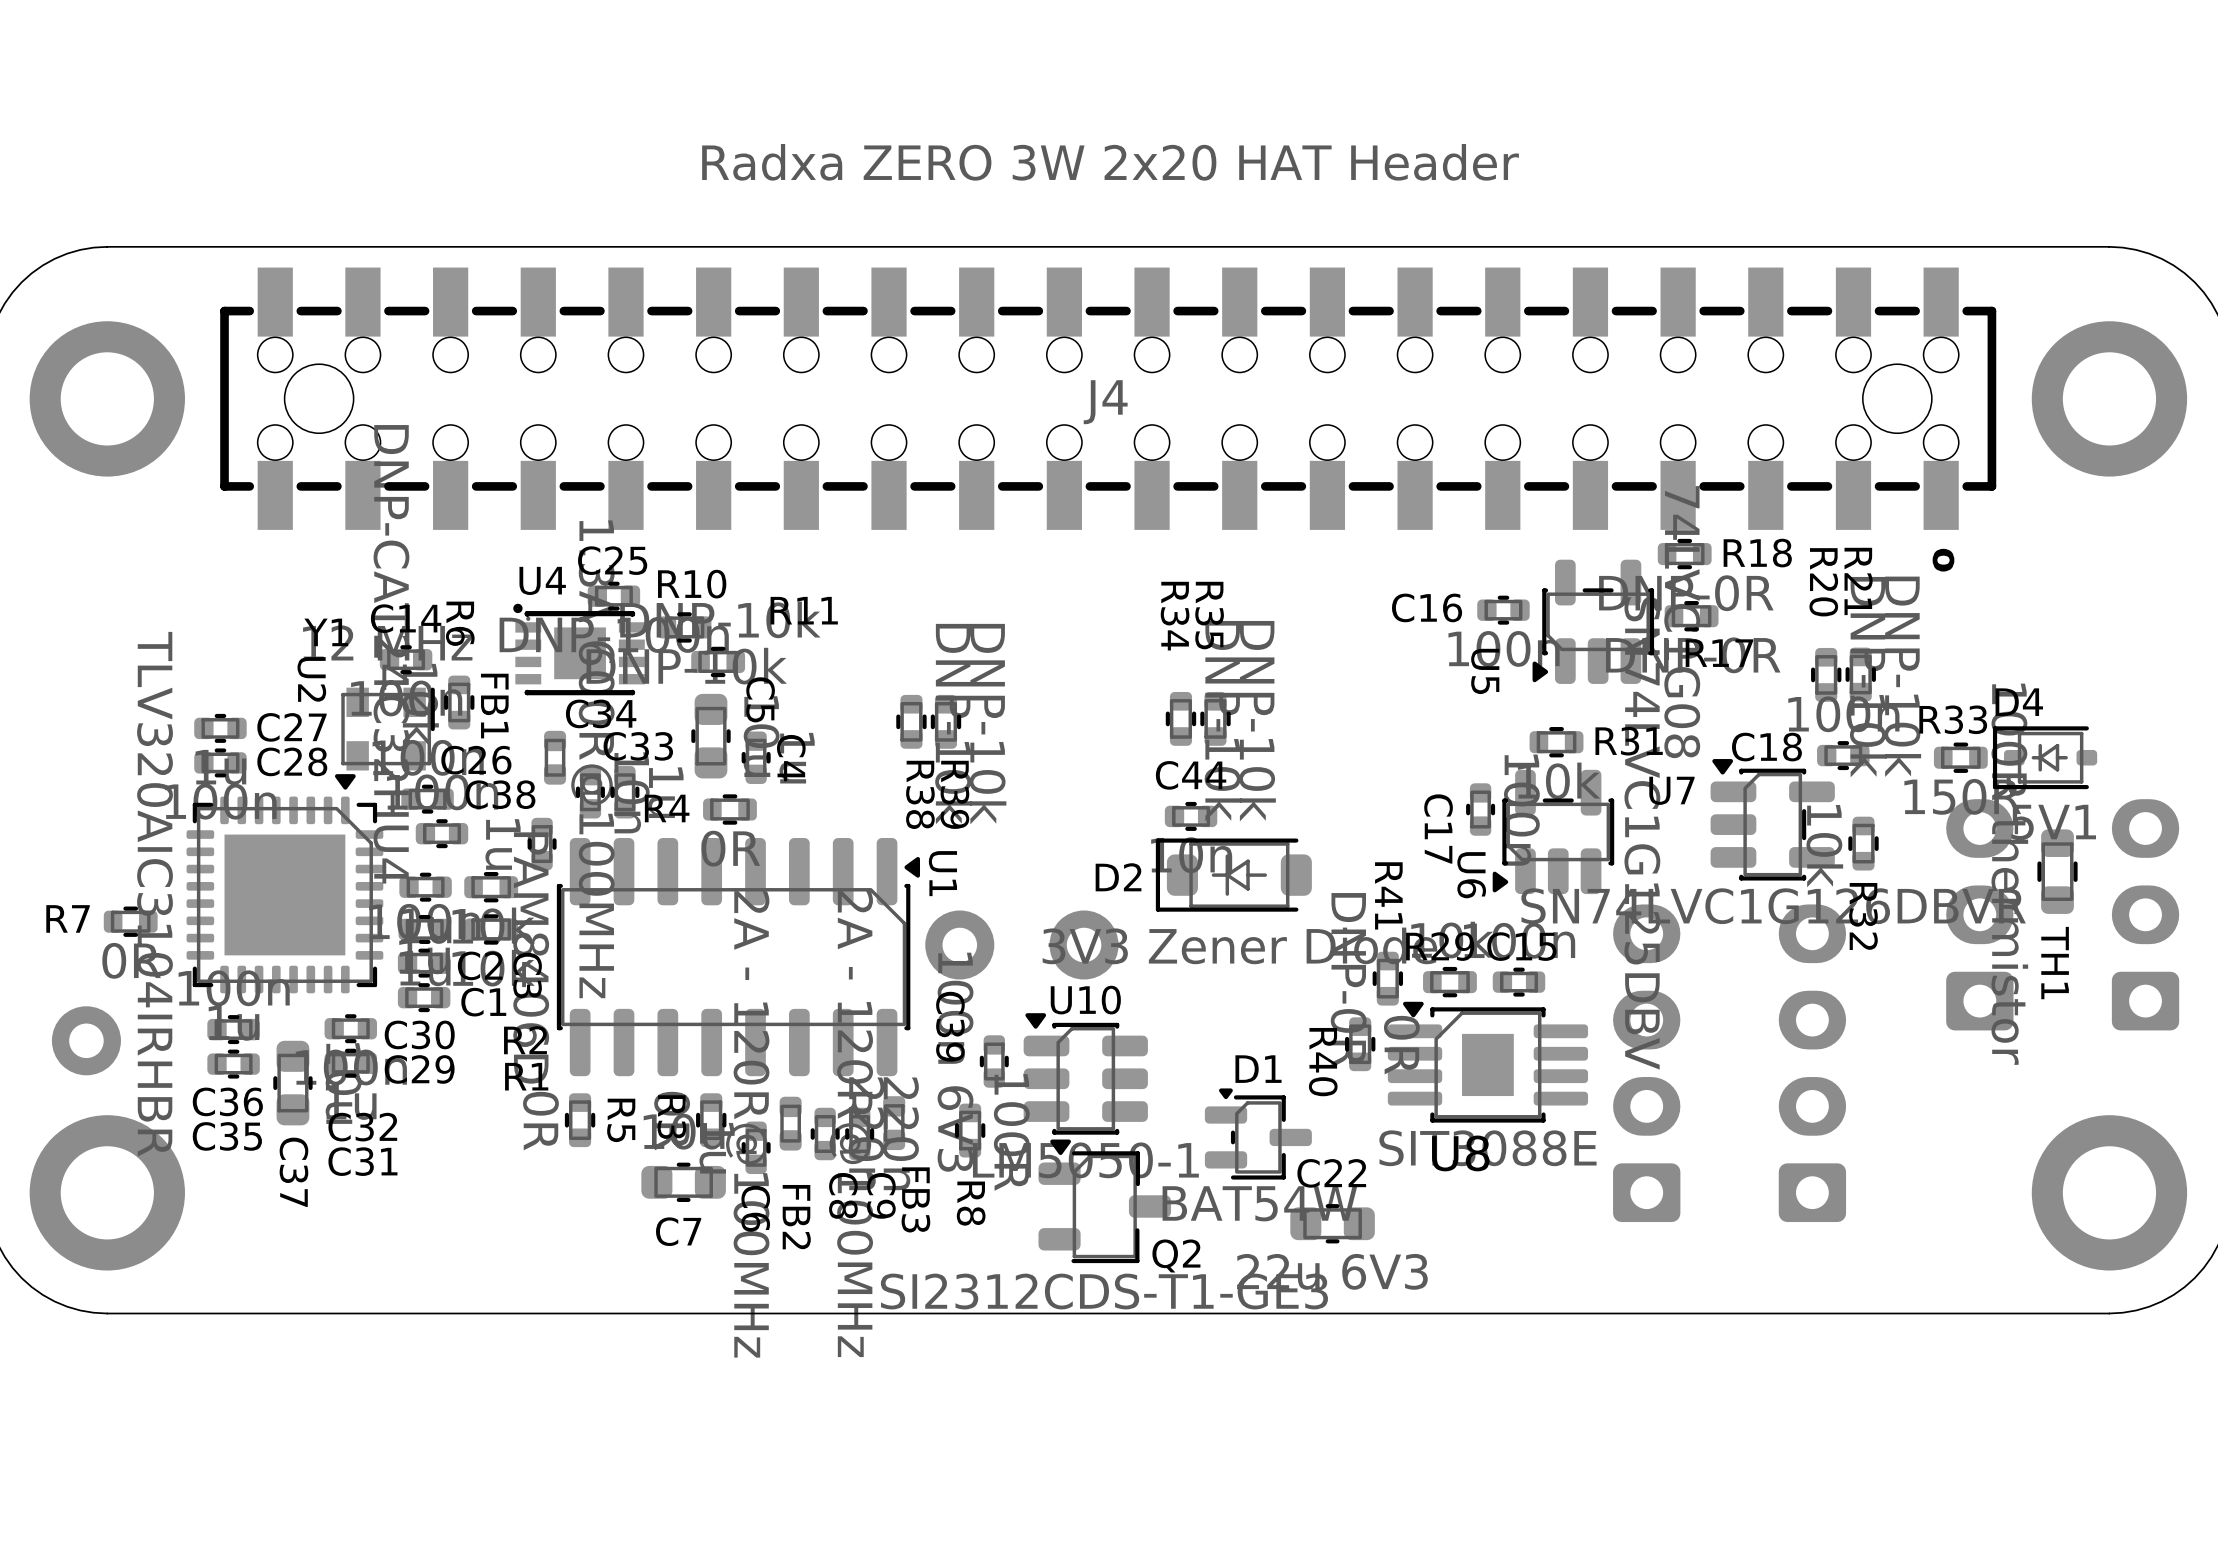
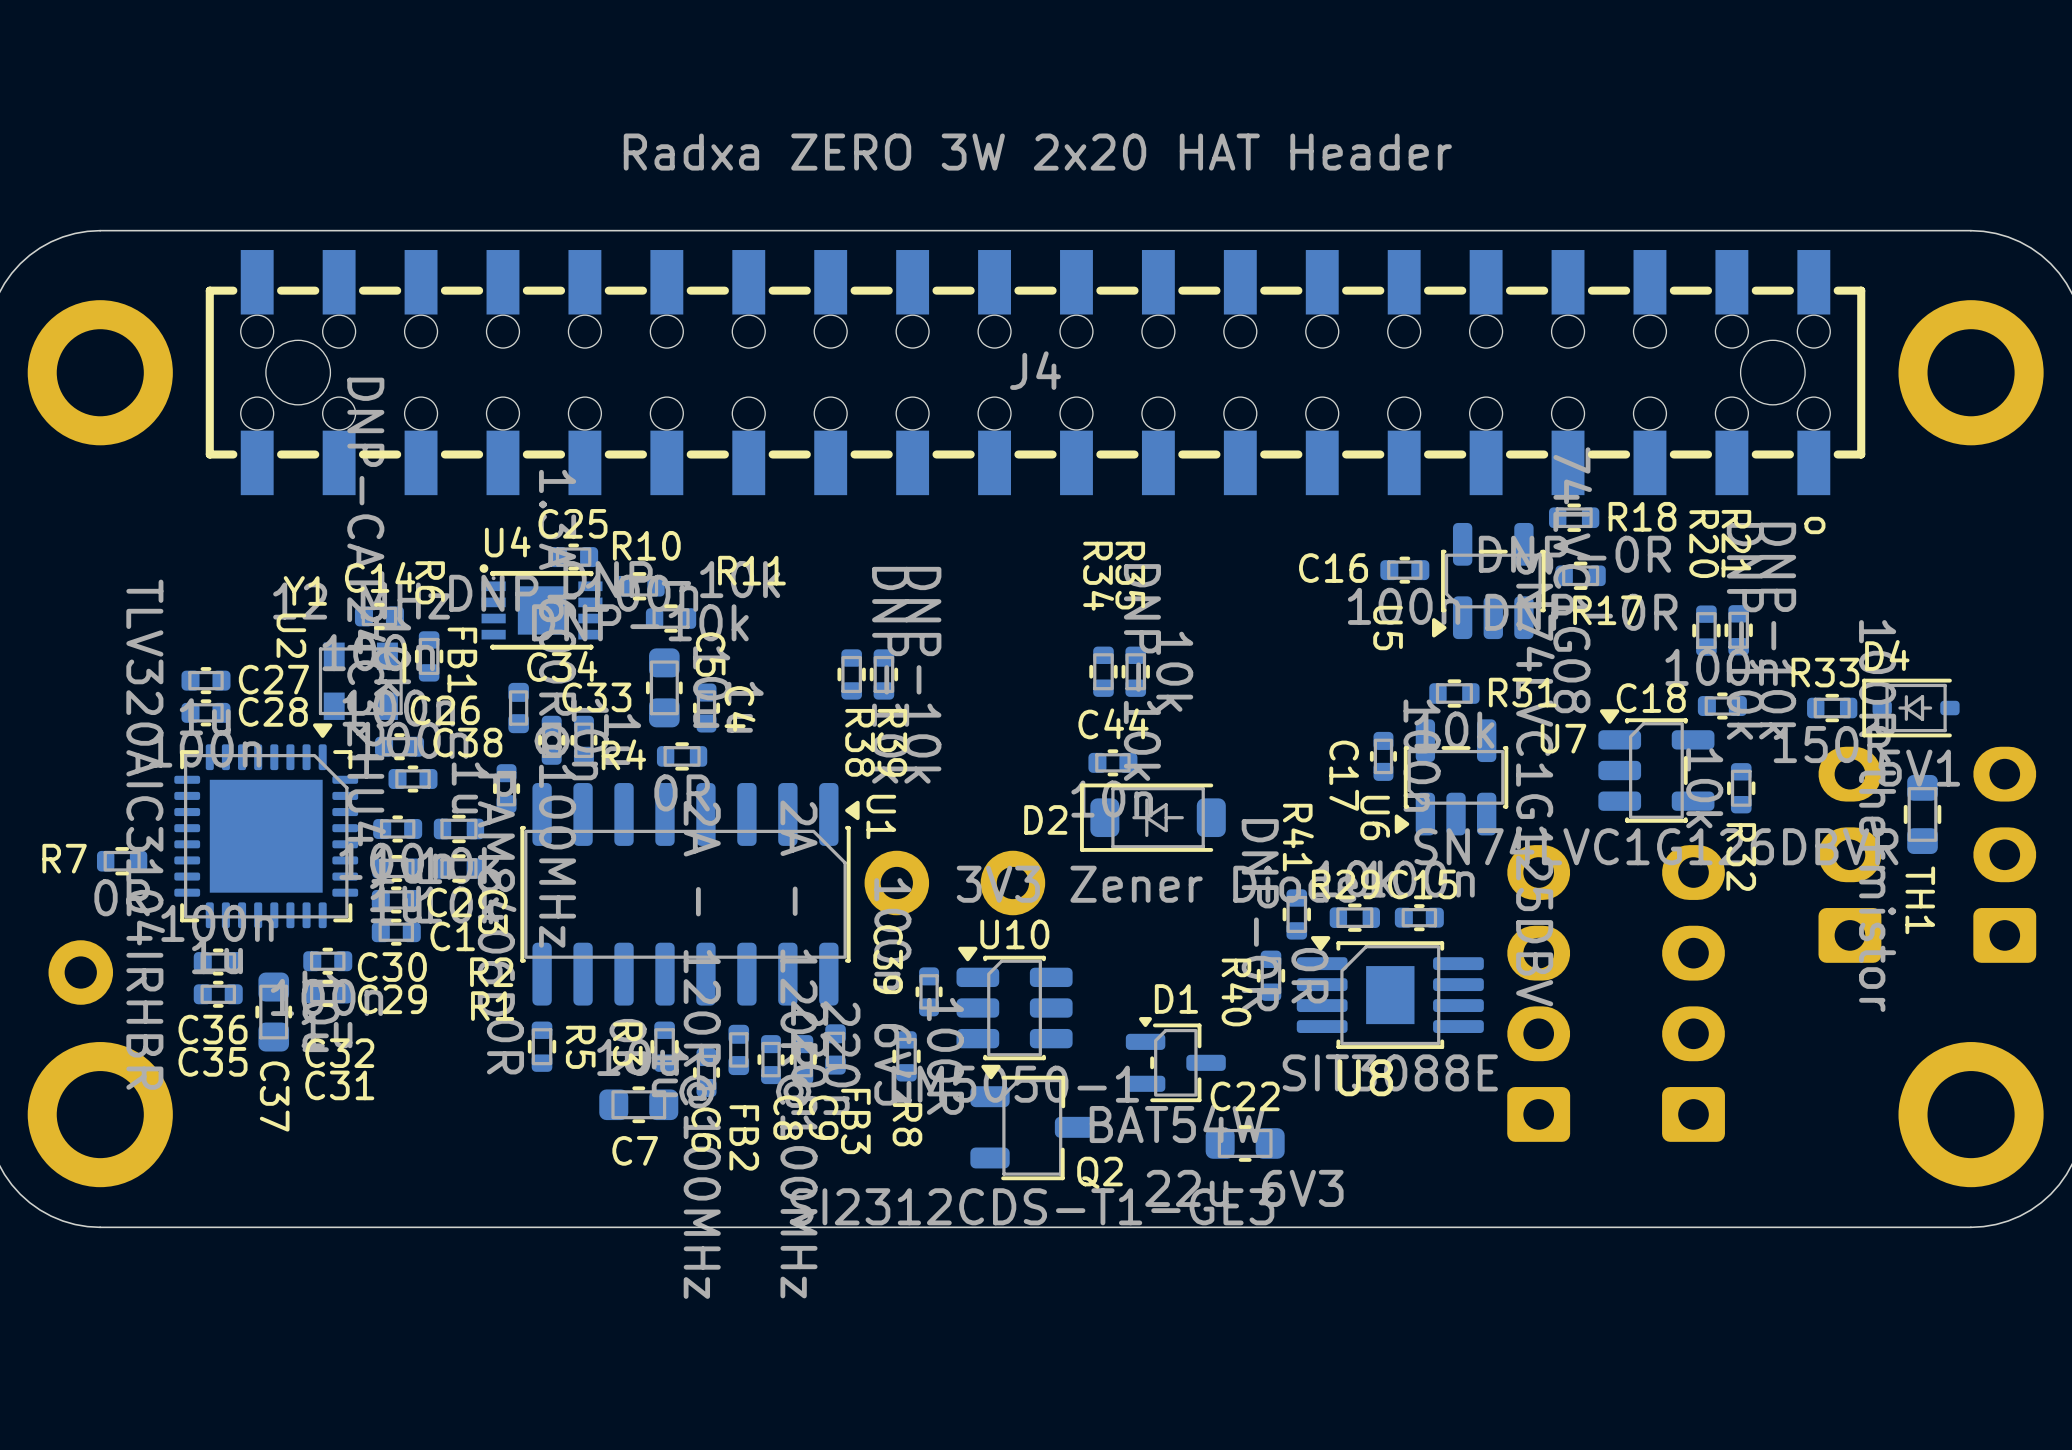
R35 value: DNP-10k (1257, 721) -> 10k (1174, 671)

